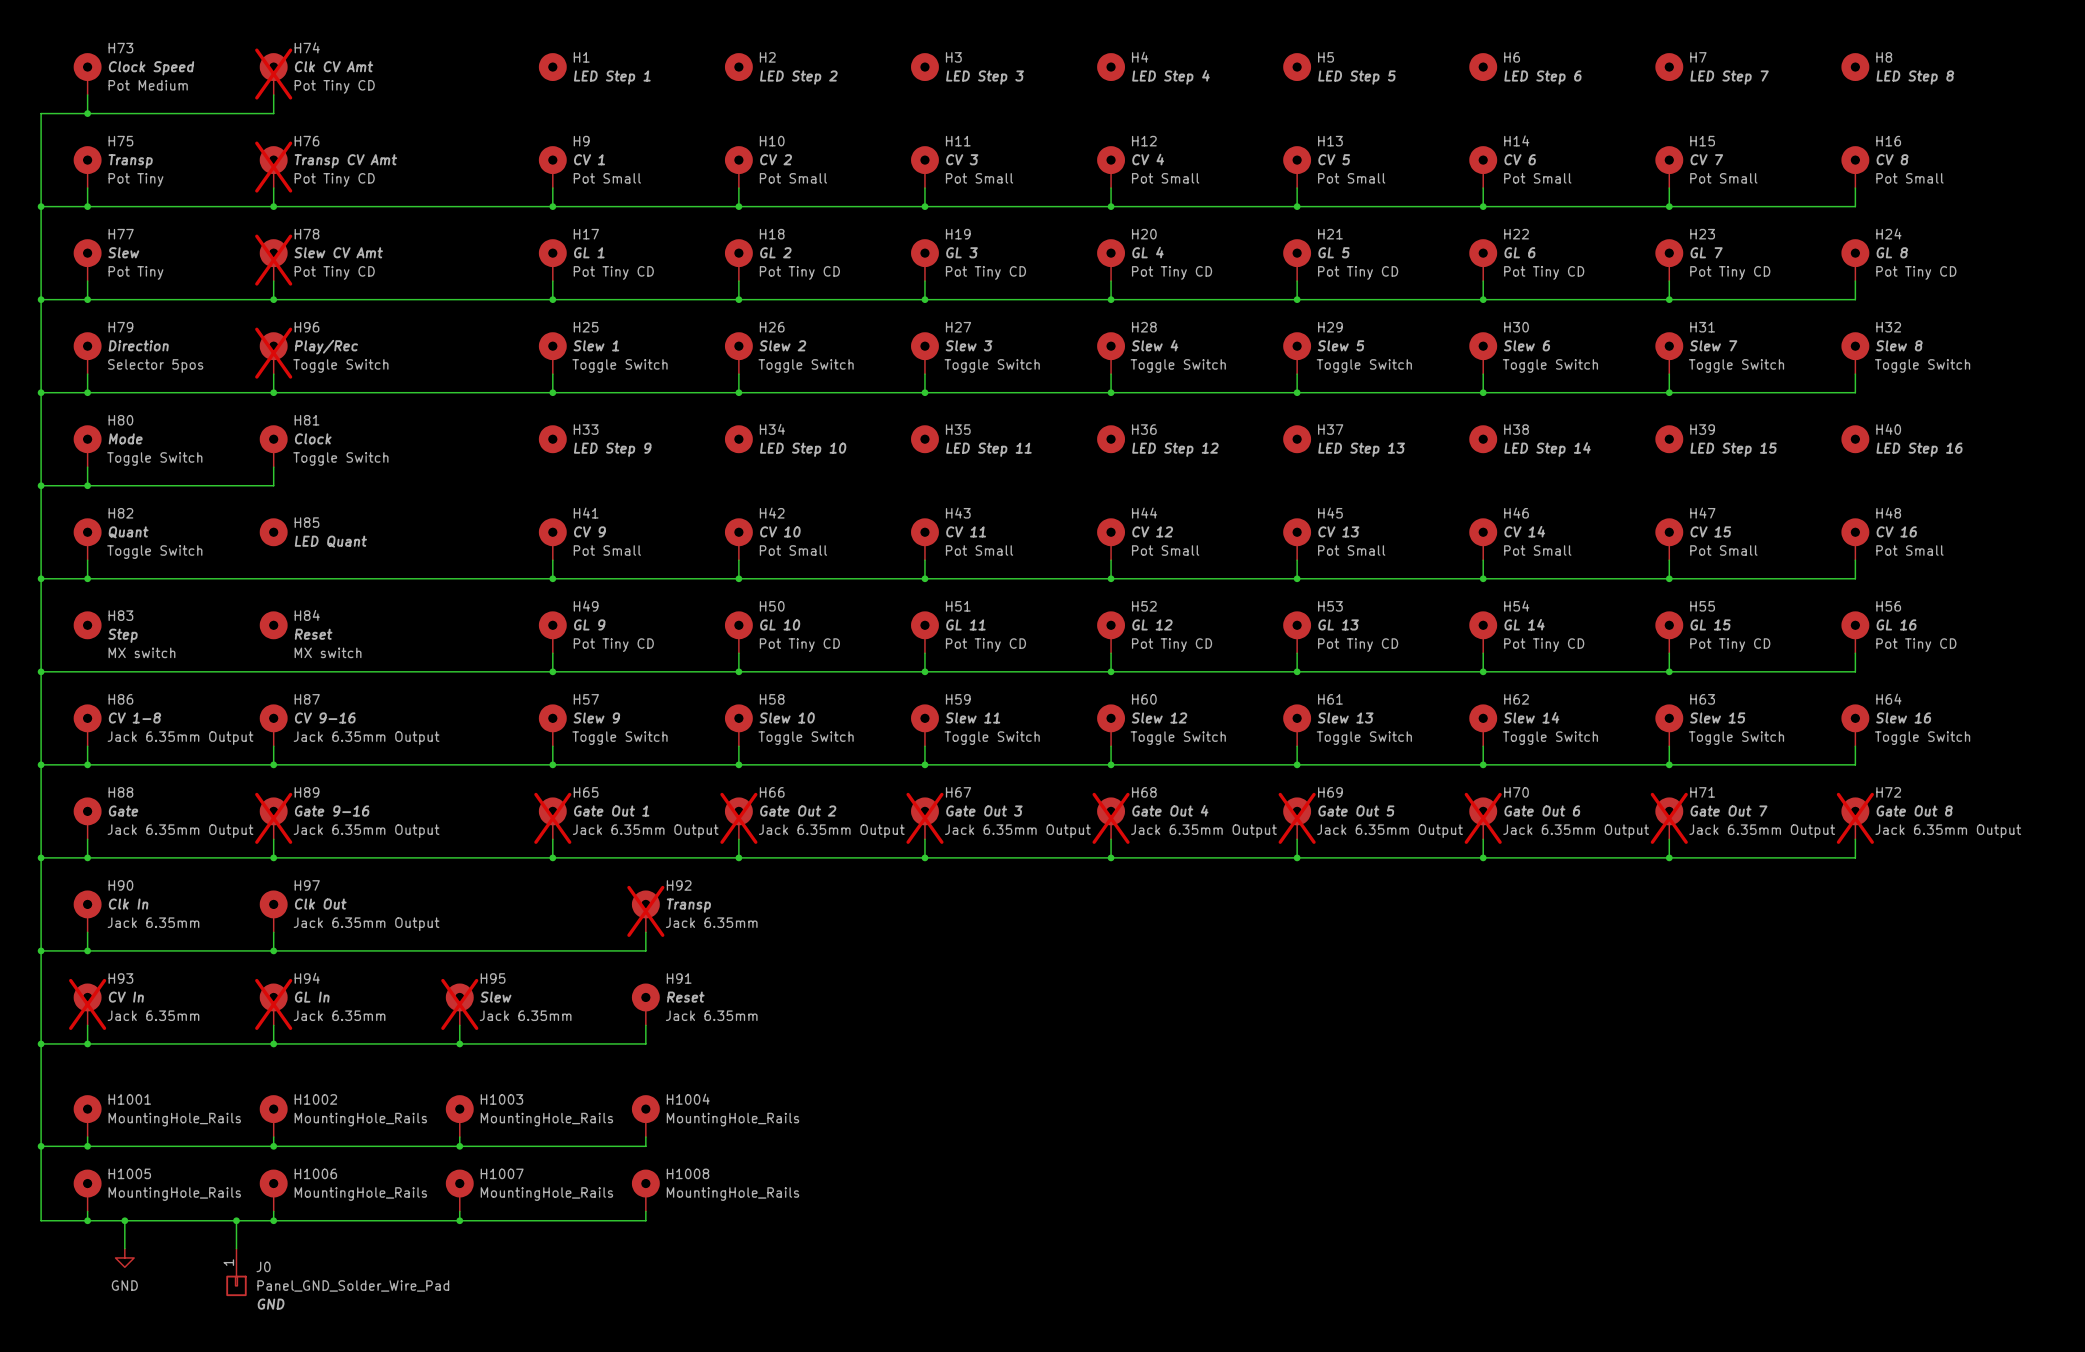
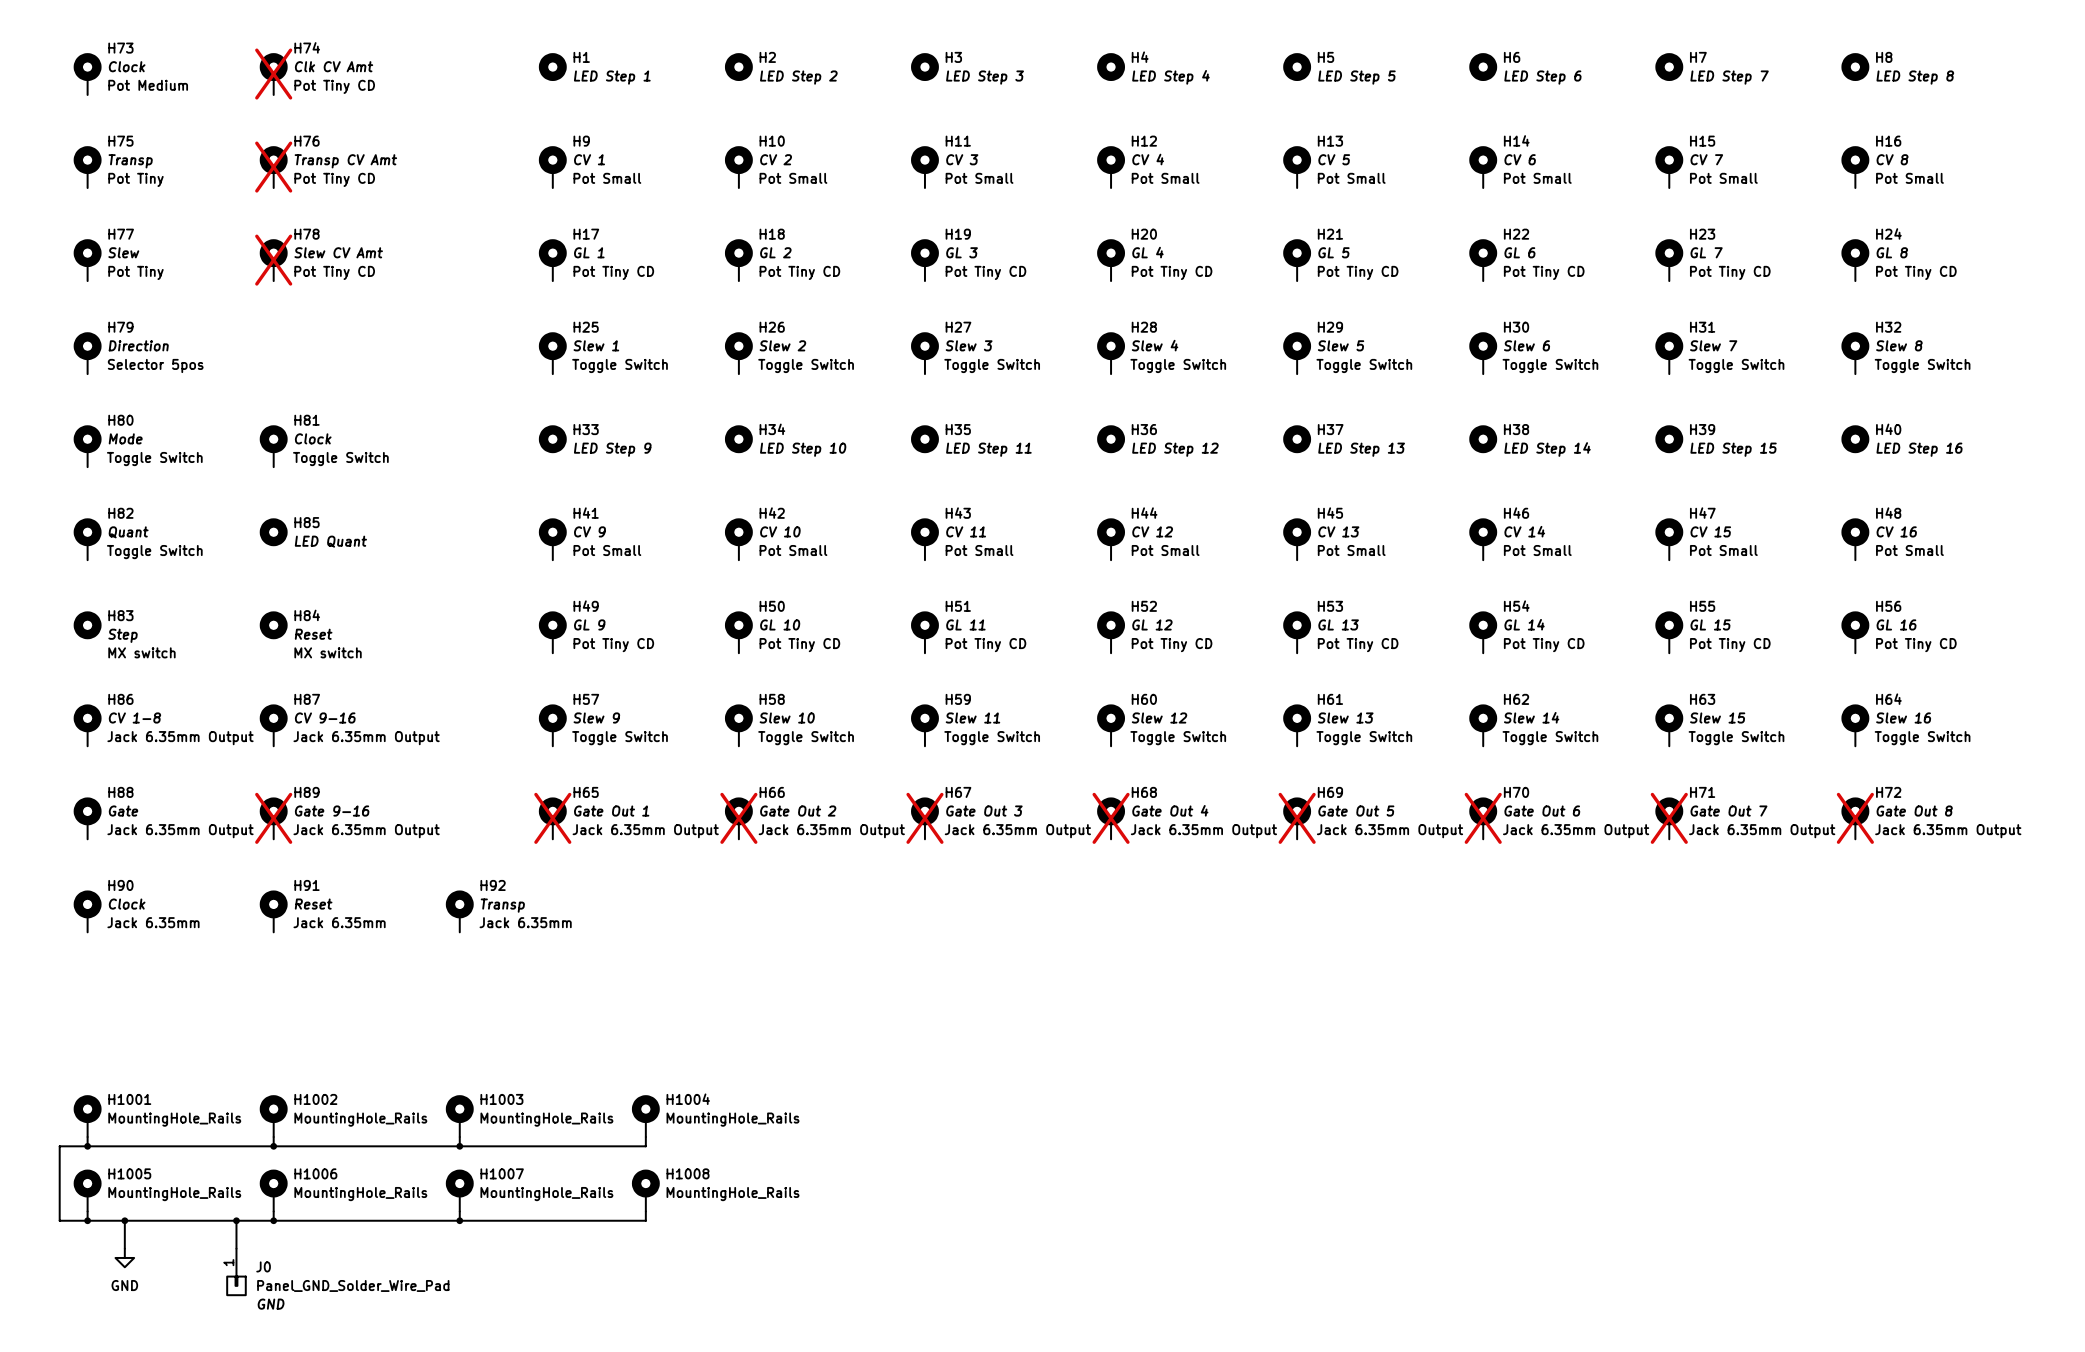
H73 value: Clock Speed (151, 68) -> Clock (127, 66)
wire: (87, 94) (87, 113) -> none
wire: (273, 94) (273, 113) (41, 113) (41, 1220) (59, 1220) -> none
junction: (87, 113) -> none
wire: (87, 188) (87, 206) -> none
wire: (273, 188) (273, 206) -> none
wire: (552, 188) (552, 206) -> none
wire: (738, 188) (738, 206) -> none
wire: (924, 188) (924, 206) -> none
wire: (1111, 188) (1111, 206) -> none
wire: (1297, 188) (1297, 206) -> none
wire: (1483, 188) (1483, 206) -> none
wire: (1669, 188) (1669, 206) -> none
wire: (1855, 188) (1855, 206) (41, 206) -> none
junction: (41, 206) -> none
junction: (87, 206) -> none
junction: (273, 206) -> none
junction: (552, 206) -> none
junction: (738, 206) -> none
junction: (924, 206) -> none
junction: (1111, 206) -> none
junction: (1297, 206) -> none
junction: (1483, 206) -> none
junction: (1669, 206) -> none
wire: (87, 281) (87, 299) -> none
wire: (273, 281) (273, 299) -> none
wire: (552, 281) (552, 299) -> none
wire: (738, 281) (738, 299) -> none
wire: (924, 281) (924, 299) -> none
wire: (1111, 281) (1111, 299) -> none
wire: (1297, 281) (1297, 299) -> none
wire: (1483, 281) (1483, 299) -> none
wire: (1669, 281) (1669, 299) -> none
wire: (1855, 281) (1855, 299) (41, 299) -> none
junction: (41, 299) -> none
junction: (87, 299) -> none
junction: (273, 299) -> none
junction: (552, 299) -> none
junction: (738, 299) -> none
junction: (924, 299) -> none
junction: (1111, 299) -> none
junction: (1297, 299) -> none
junction: (1483, 299) -> none
junction: (1669, 299) -> none
H96: Play/Rec (273, 353) -> none
wire: (87, 374) (87, 392) -> none
wire: (273, 374) (273, 392) -> none
wire: (552, 374) (552, 392) -> none
wire: (738, 374) (738, 392) -> none
wire: (924, 374) (924, 392) -> none
wire: (1111, 374) (1111, 392) -> none
wire: (1297, 374) (1297, 392) -> none
wire: (1483, 374) (1483, 392) -> none
wire: (1669, 374) (1669, 392) -> none
wire: (1855, 374) (1855, 392) (41, 392) -> none
junction: (41, 392) -> none
junction: (87, 392) -> none
junction: (273, 392) -> none
junction: (552, 392) -> none
junction: (738, 392) -> none
junction: (924, 392) -> none
junction: (1111, 392) -> none
junction: (1297, 392) -> none
junction: (1483, 392) -> none
junction: (1669, 392) -> none
wire: (87, 467) (87, 485) -> none
wire: (273, 467) (273, 485) (41, 485) -> none
junction: (41, 485) -> none
junction: (87, 485) -> none
wire: (87, 560) (87, 578) -> none
wire: (552, 560) (552, 578) -> none
wire: (738, 560) (738, 578) -> none
wire: (924, 560) (924, 578) -> none
wire: (1111, 560) (1111, 578) -> none
wire: (1297, 560) (1297, 578) -> none
wire: (1483, 560) (1483, 578) -> none
wire: (1669, 560) (1669, 578) -> none
wire: (1855, 560) (1855, 578) (41, 578) -> none
junction: (41, 578) -> none
junction: (87, 578) -> none
junction: (552, 578) -> none
junction: (738, 578) -> none
junction: (924, 578) -> none
junction: (1111, 578) -> none
junction: (1297, 578) -> none
junction: (1483, 578) -> none
junction: (1669, 578) -> none
wire: (552, 653) (552, 671) -> none
wire: (738, 653) (738, 671) -> none
wire: (924, 653) (924, 671) -> none
wire: (1111, 653) (1111, 671) -> none
wire: (1297, 653) (1297, 671) -> none
wire: (1483, 653) (1483, 671) -> none
wire: (1669, 653) (1669, 671) -> none
wire: (1855, 653) (1855, 671) (41, 671) -> none
junction: (41, 671) -> none
junction: (552, 671) -> none
junction: (738, 671) -> none
junction: (924, 671) -> none
junction: (1111, 671) -> none
junction: (1297, 671) -> none
junction: (1483, 671) -> none
junction: (1669, 671) -> none
wire: (87, 746) (87, 764) -> none
wire: (273, 746) (273, 764) -> none
wire: (552, 746) (552, 764) -> none
wire: (738, 746) (738, 764) -> none
wire: (924, 746) (924, 764) -> none
wire: (1111, 746) (1111, 764) -> none
wire: (1297, 746) (1297, 764) -> none
wire: (1483, 746) (1483, 764) -> none
wire: (1669, 746) (1669, 764) -> none
wire: (1855, 746) (1855, 764) (41, 764) -> none
junction: (41, 764) -> none
junction: (87, 764) -> none
junction: (273, 764) -> none
junction: (552, 764) -> none
junction: (738, 764) -> none
junction: (924, 764) -> none
junction: (1111, 764) -> none
junction: (1297, 764) -> none
junction: (1483, 764) -> none
junction: (1669, 764) -> none
wire: (87, 839) (87, 857) -> none
wire: (273, 839) (273, 857) -> none
wire: (552, 839) (552, 857) -> none
wire: (738, 839) (738, 857) -> none
wire: (924, 839) (924, 857) -> none
wire: (1111, 839) (1111, 857) -> none
wire: (1297, 839) (1297, 857) -> none
wire: (1483, 839) (1483, 857) -> none
wire: (1669, 839) (1669, 857) -> none
wire: (1855, 839) (1855, 857) (41, 857) -> none
junction: (41, 857) -> none
junction: (87, 857) -> none
junction: (273, 857) -> none
junction: (552, 857) -> none
junction: (738, 857) -> none
junction: (924, 857) -> none
junction: (1111, 857) -> none
junction: (1297, 857) -> none
junction: (1483, 857) -> none
junction: (1669, 857) -> none
H97 name: H97 (307, 885) -> H91 (306, 885)
H90 value: Clk In (128, 904) -> Clock (127, 904)
H97 value: Clk Out (320, 904) -> Reset (313, 904)
H92 position: (645, 911) -> (459, 911)
H92 do-not-place cross: (645, 911) -> none
H97 text: Jack 6.35mm Output (366, 924) -> Jack 6.35mm (339, 922)
wire: (87, 932) (87, 950) -> none
wire: (273, 932) (273, 950) -> none
wire: (645, 932) (645, 950) (41, 950) -> none
junction: (41, 950) -> none
junction: (87, 950) -> none
junction: (273, 950) -> none
H93: CV In (87, 1004) -> none
H94: GL In (273, 1004) -> none
H95: Slew (459, 1004) -> none
H91: Reset (645, 1004) -> none
wire: (87, 1025) (87, 1043) -> none
wire: (273, 1025) (273, 1043) -> none
wire: (459, 1025) (459, 1043) -> none
wire: (645, 1025) (645, 1043) (41, 1043) -> none
junction: (41, 1043) -> none
junction: (87, 1043) -> none
junction: (273, 1043) -> none
junction: (459, 1043) -> none
wire: (41, 1146) (59, 1146) -> (59, 1220) (59, 1146)
junction: (41, 1146) -> none

